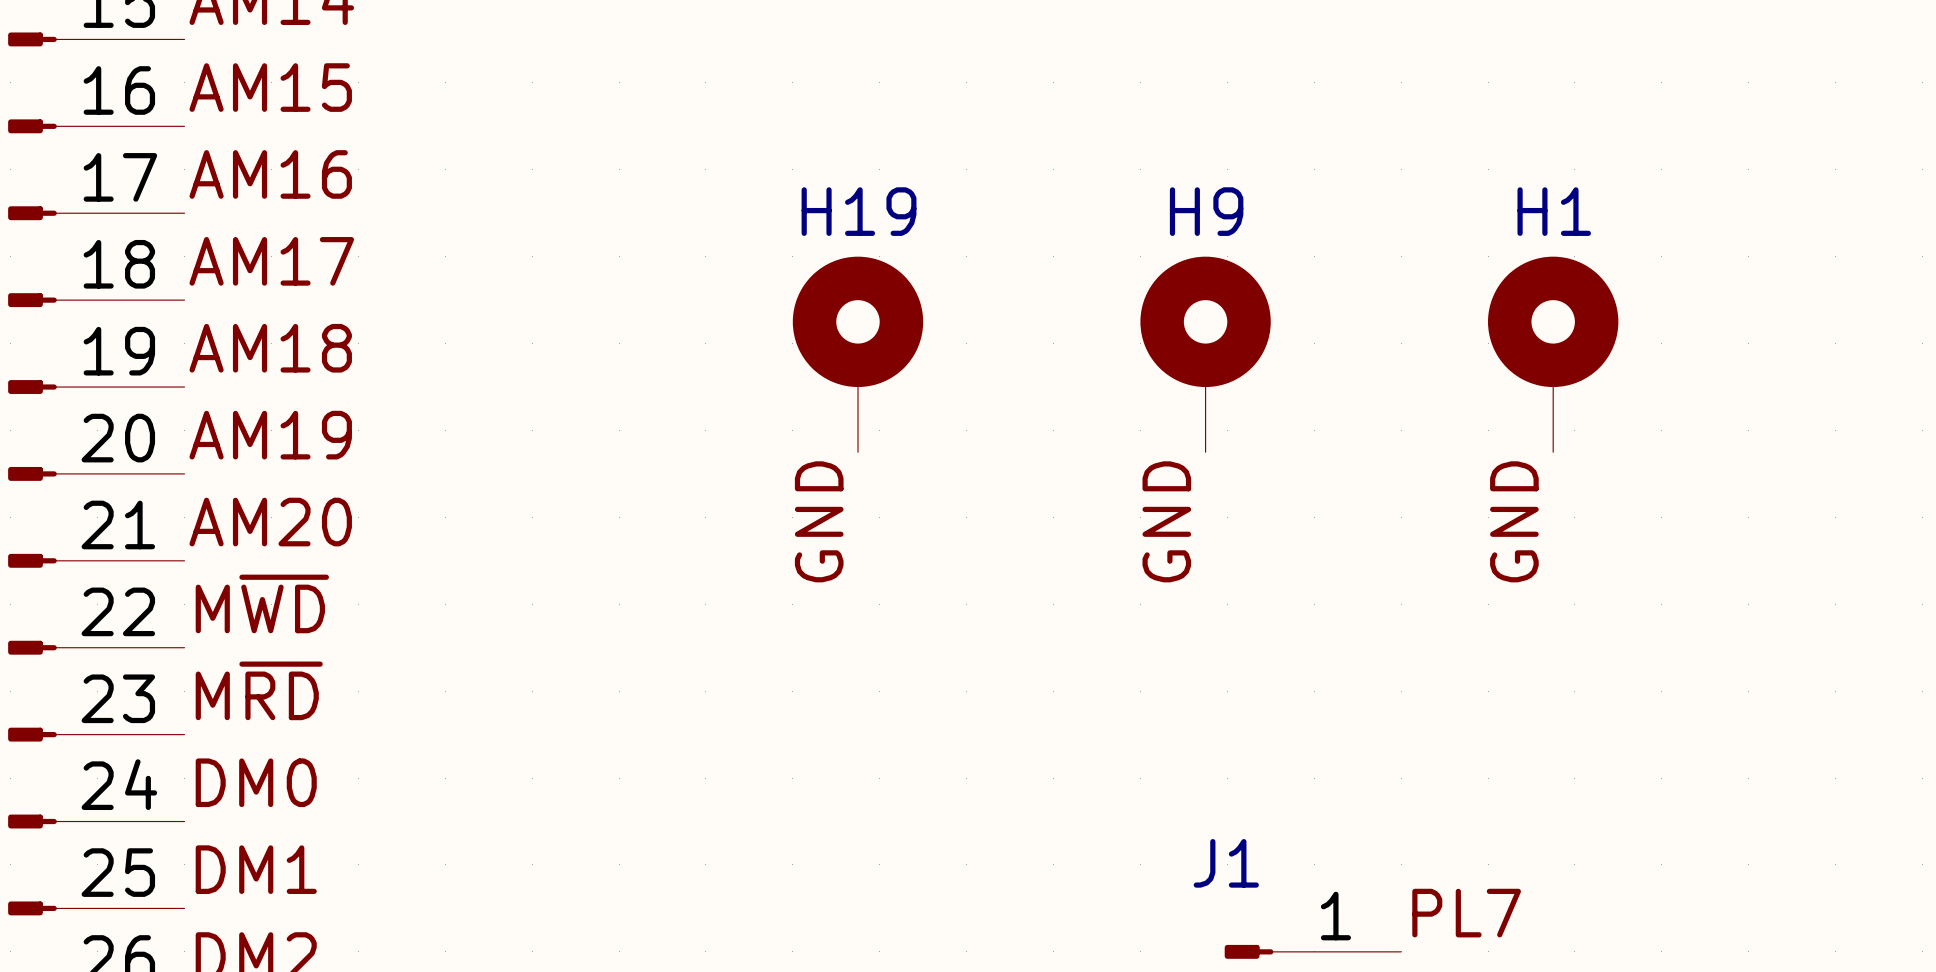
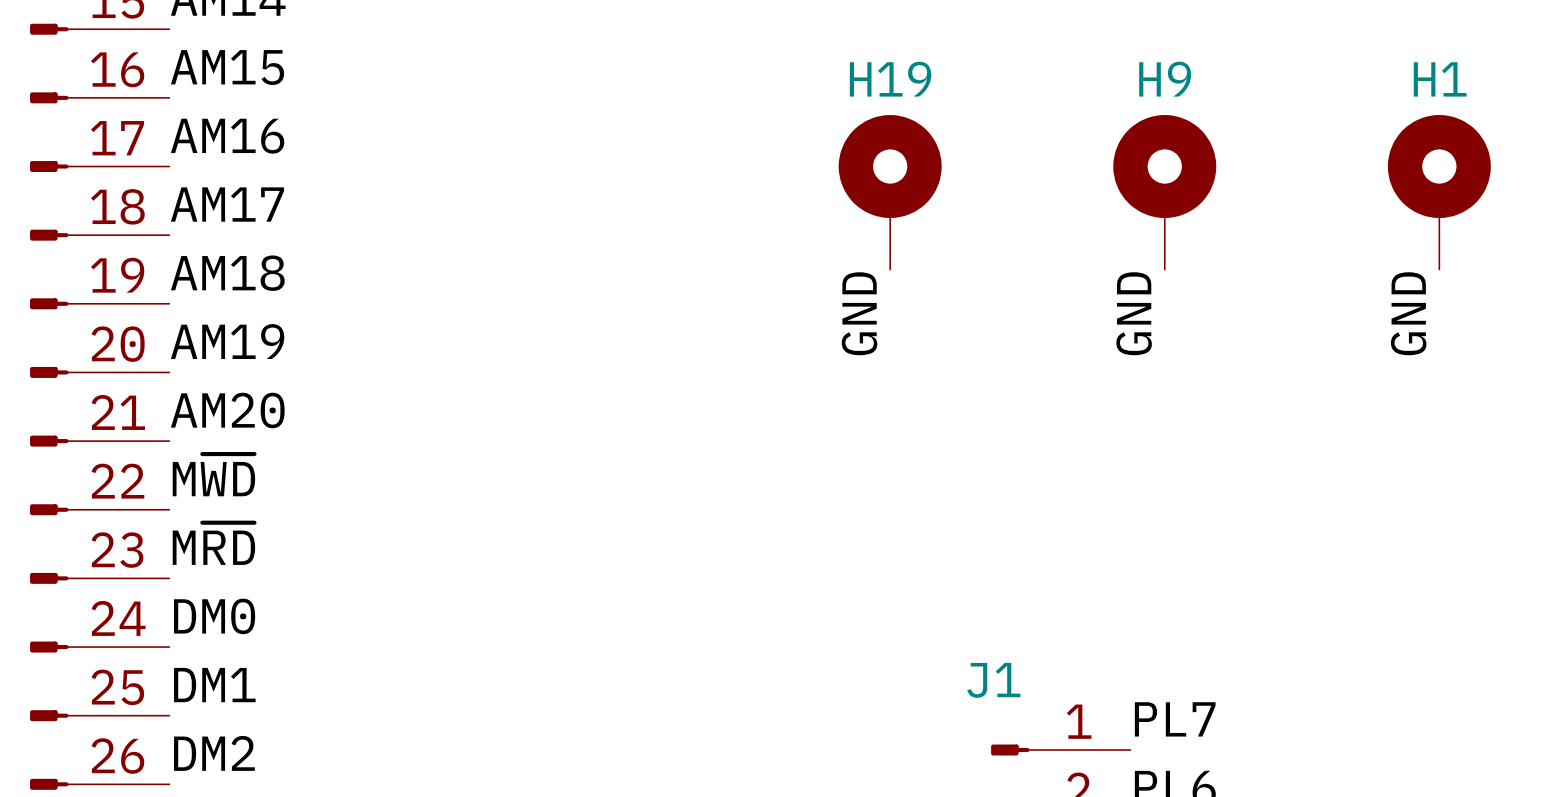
H19 position: (857, 354) -> (890, 192)
H9 position: (1205, 354) -> (1164, 192)
H1 position: (1553, 354) -> (1439, 192)
label: none -> GND (859, 313)
label: none -> GND (1134, 313)
label: none -> GND (1408, 313)
label: GND (819, 521) -> none
label: GND (1166, 521) -> none
label: GND (1514, 521) -> none

